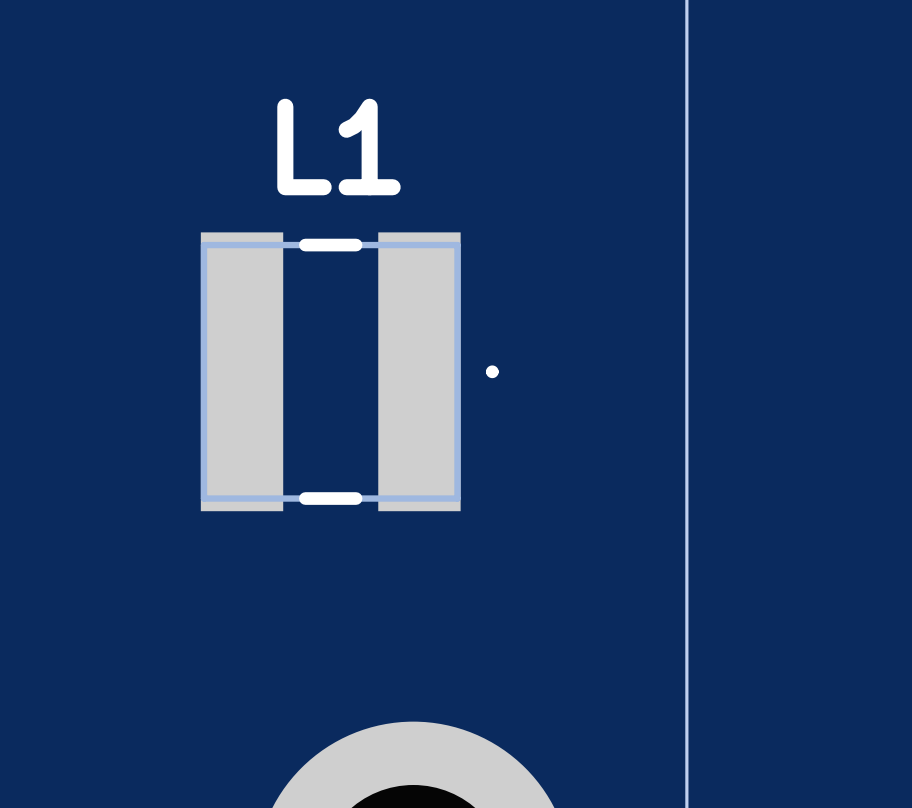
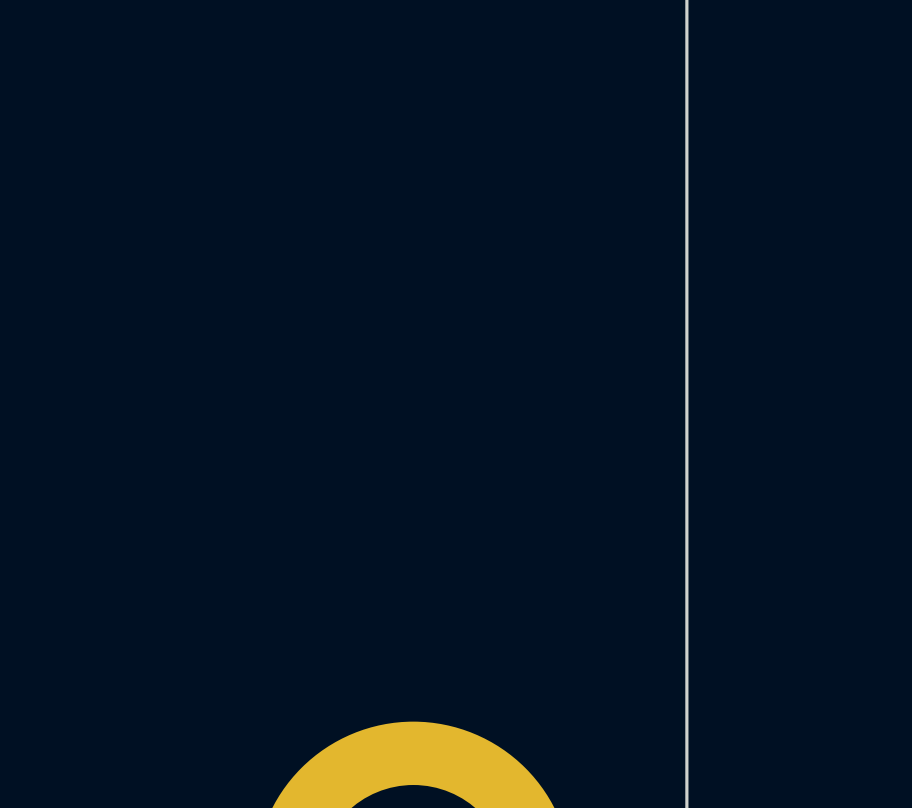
L1: (349, 371) -> none

